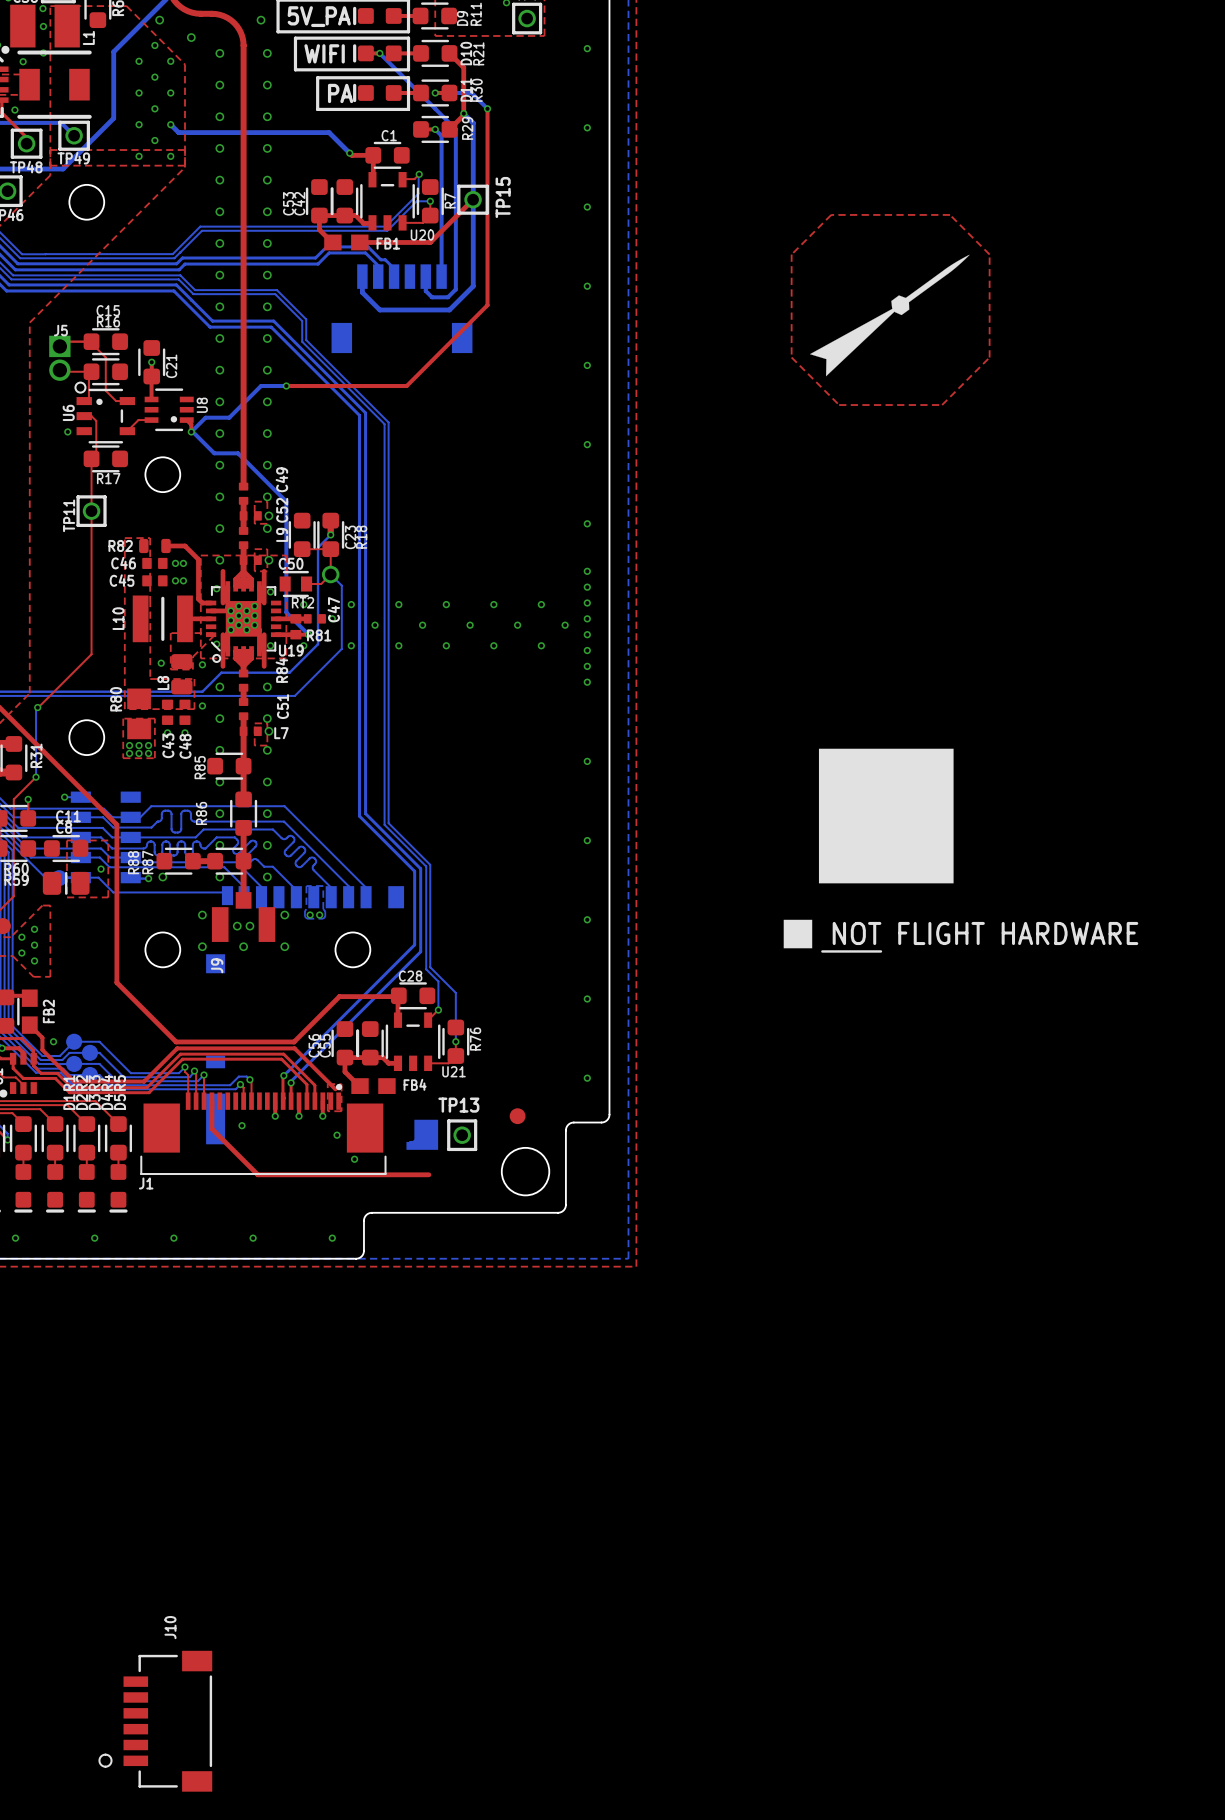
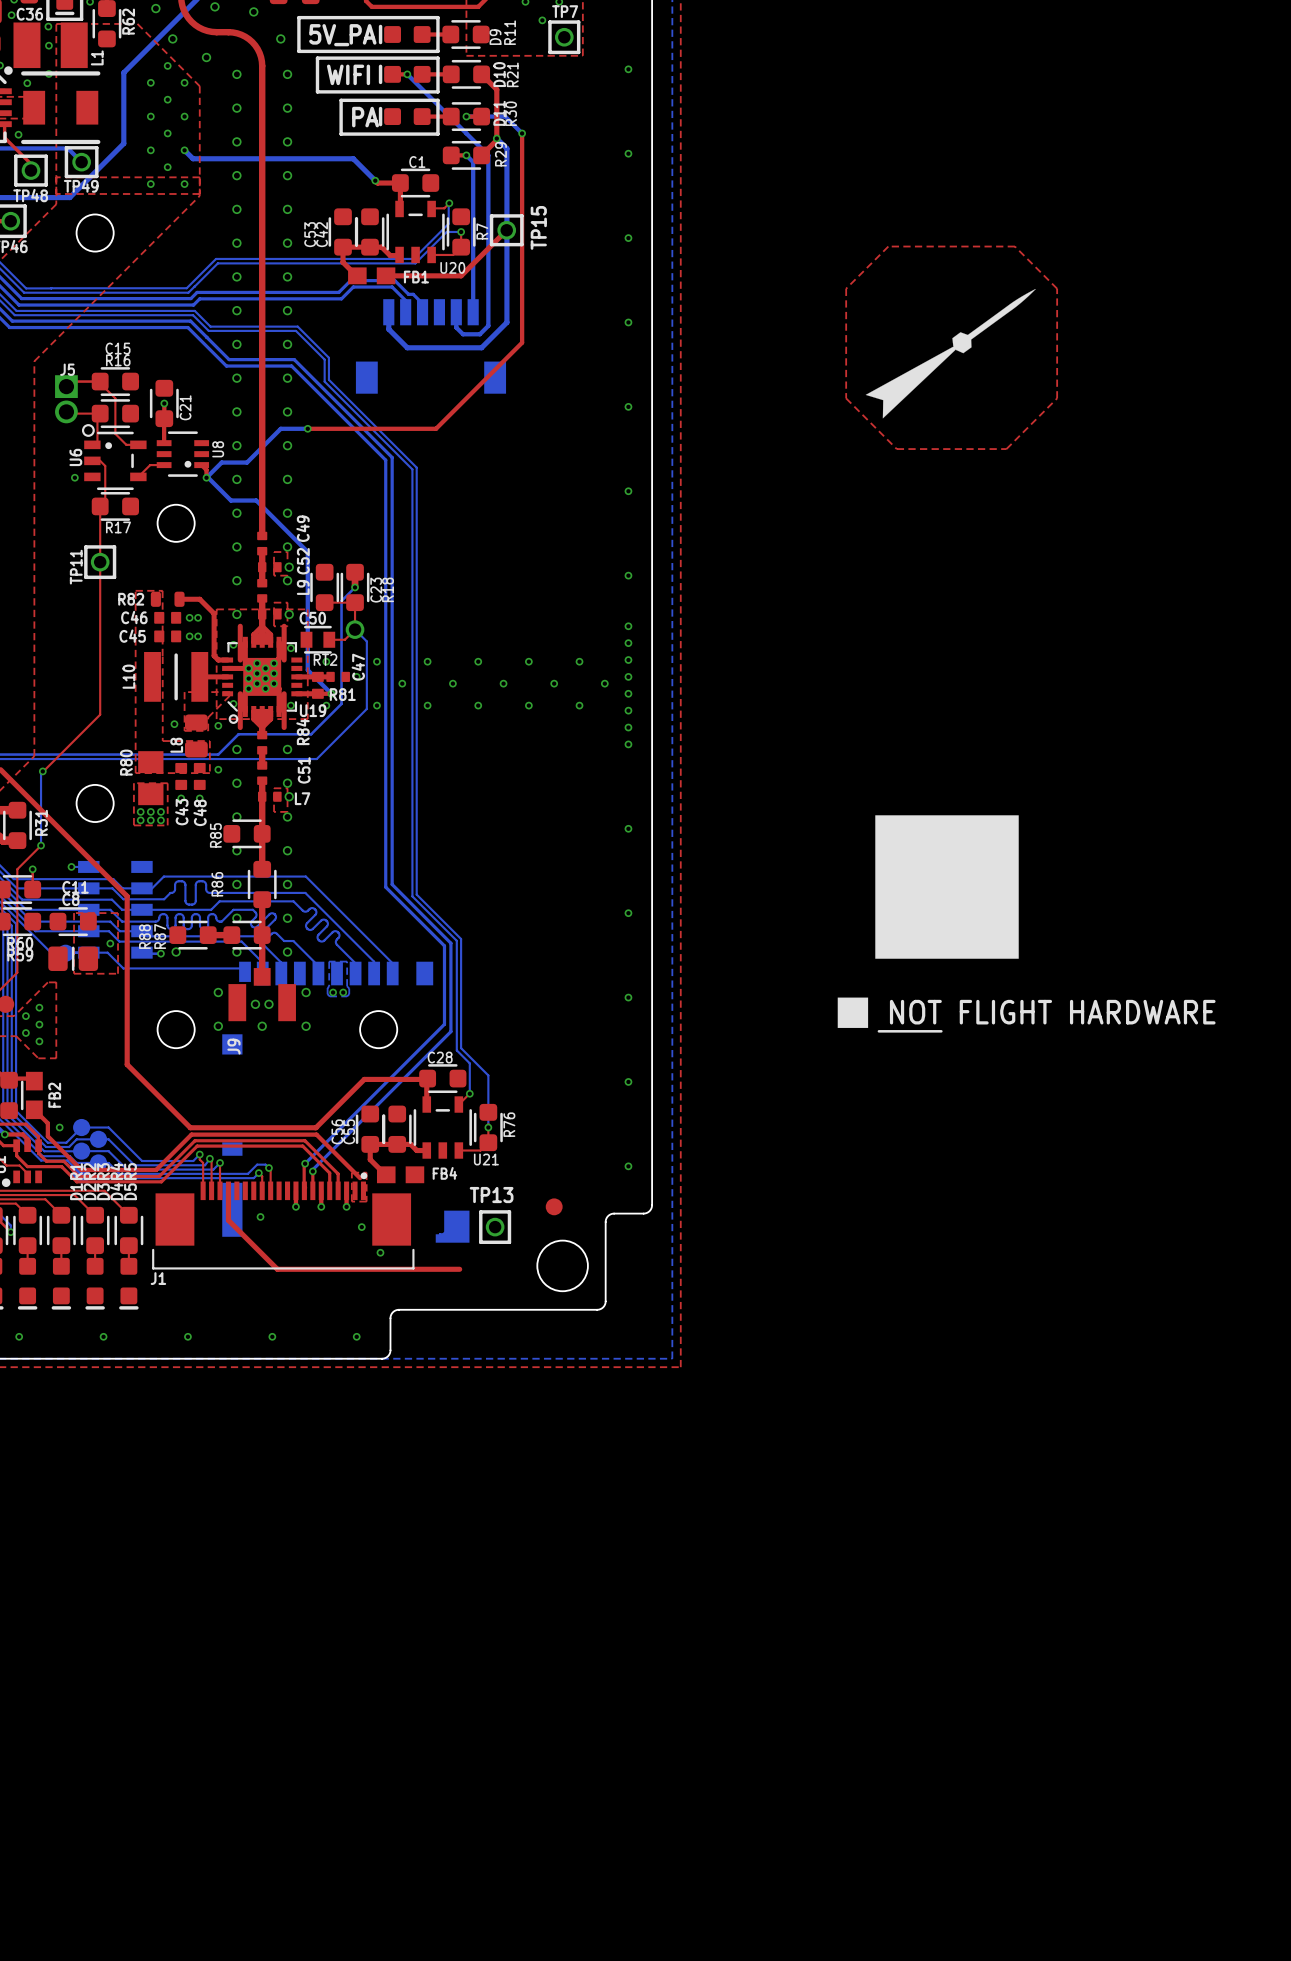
J10: (155, 1721) -> none

